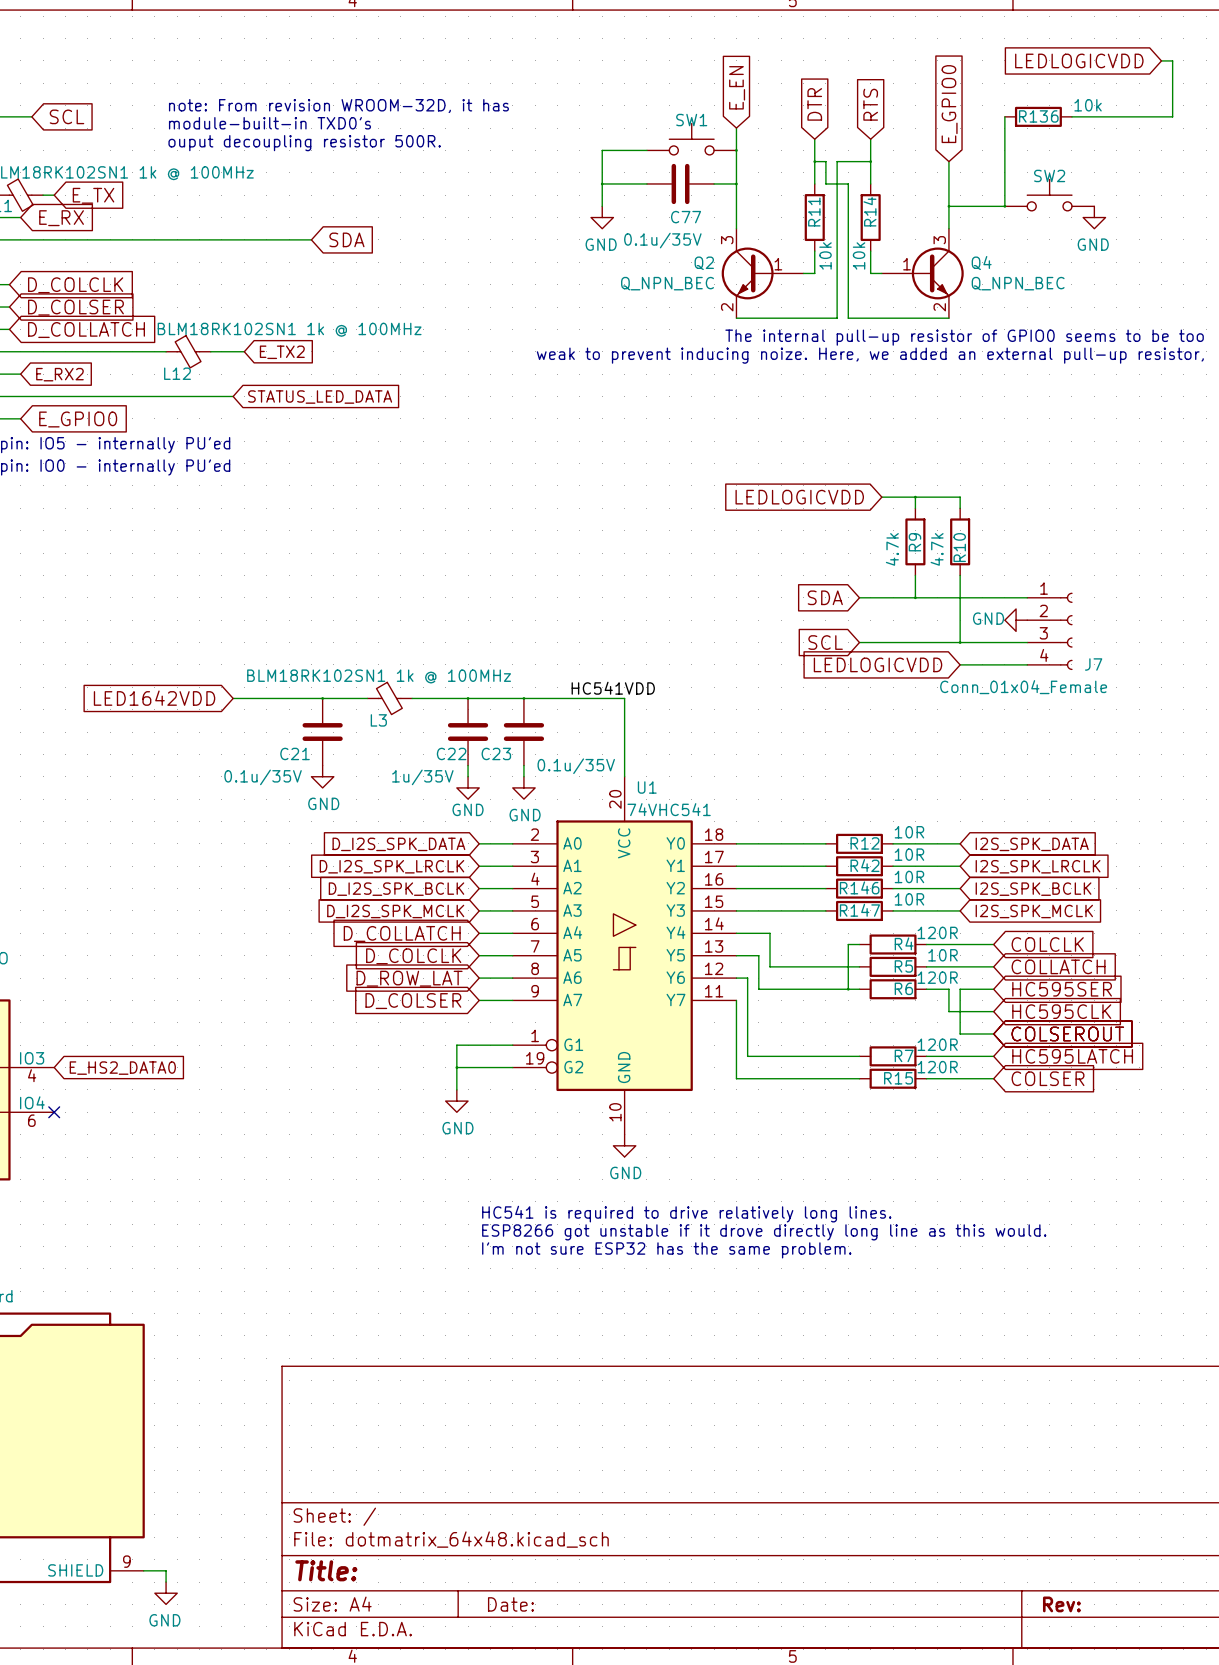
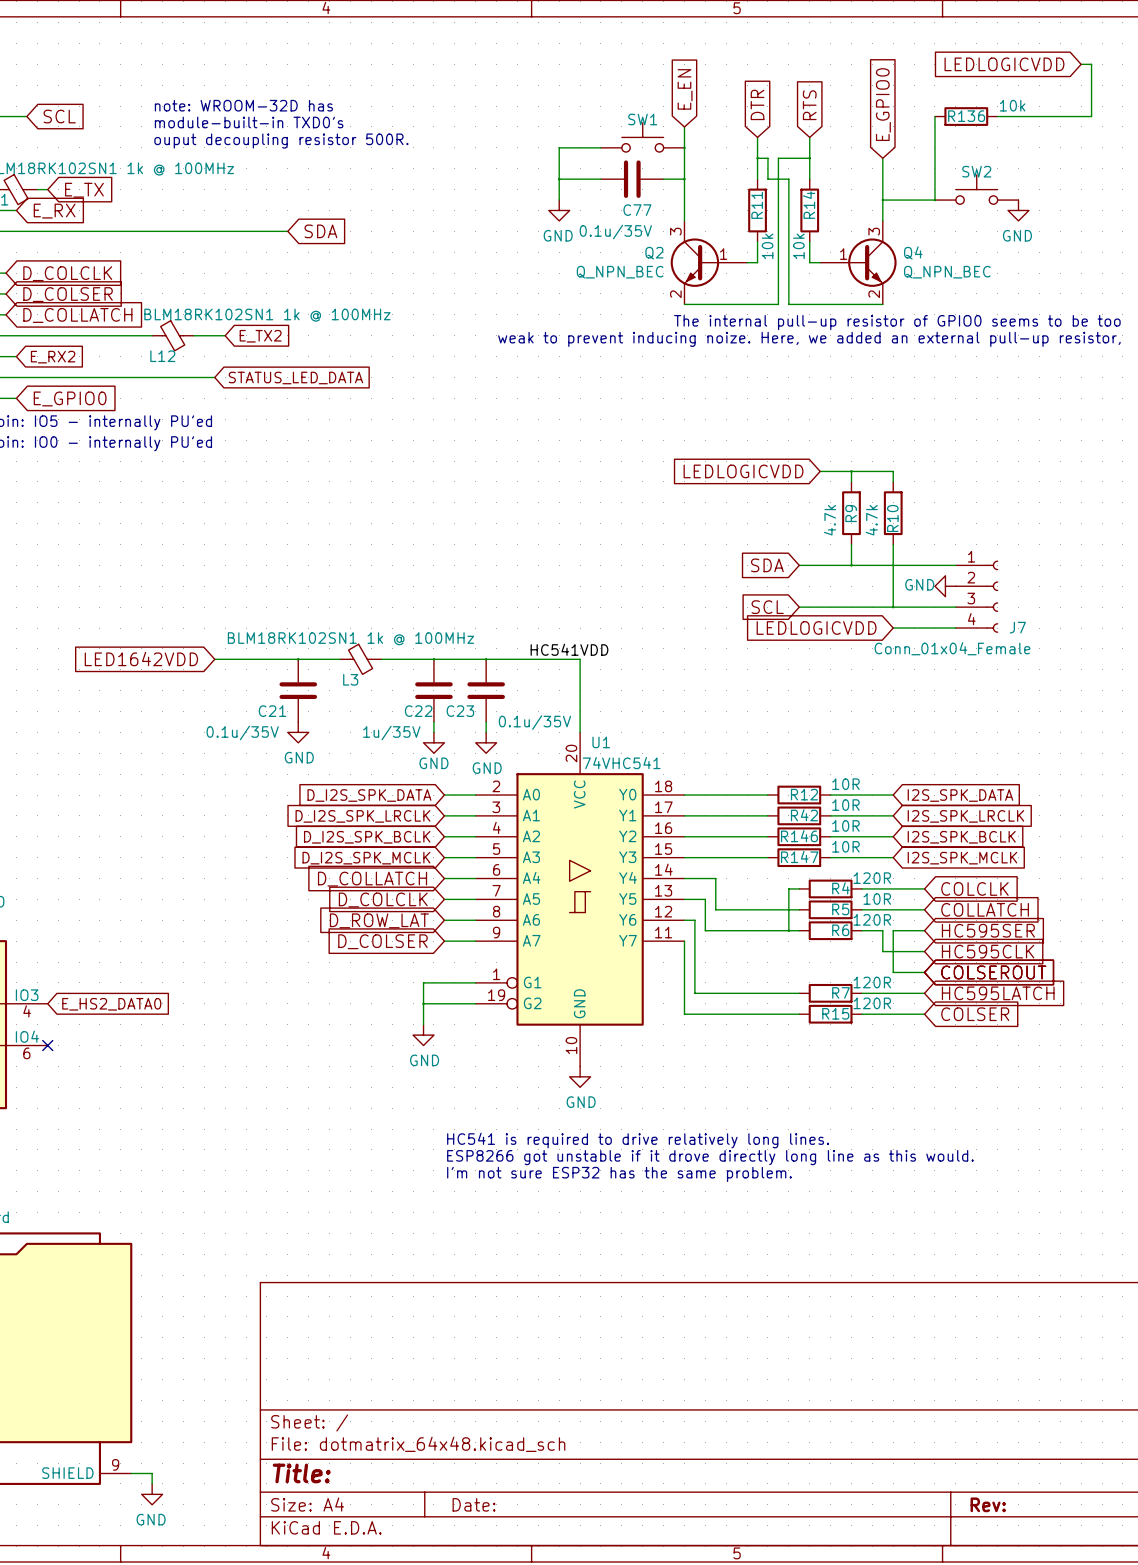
text: note: From revision WROOM-32D, it has (338, 106) -> note: WROOM-32D has (243, 105)

